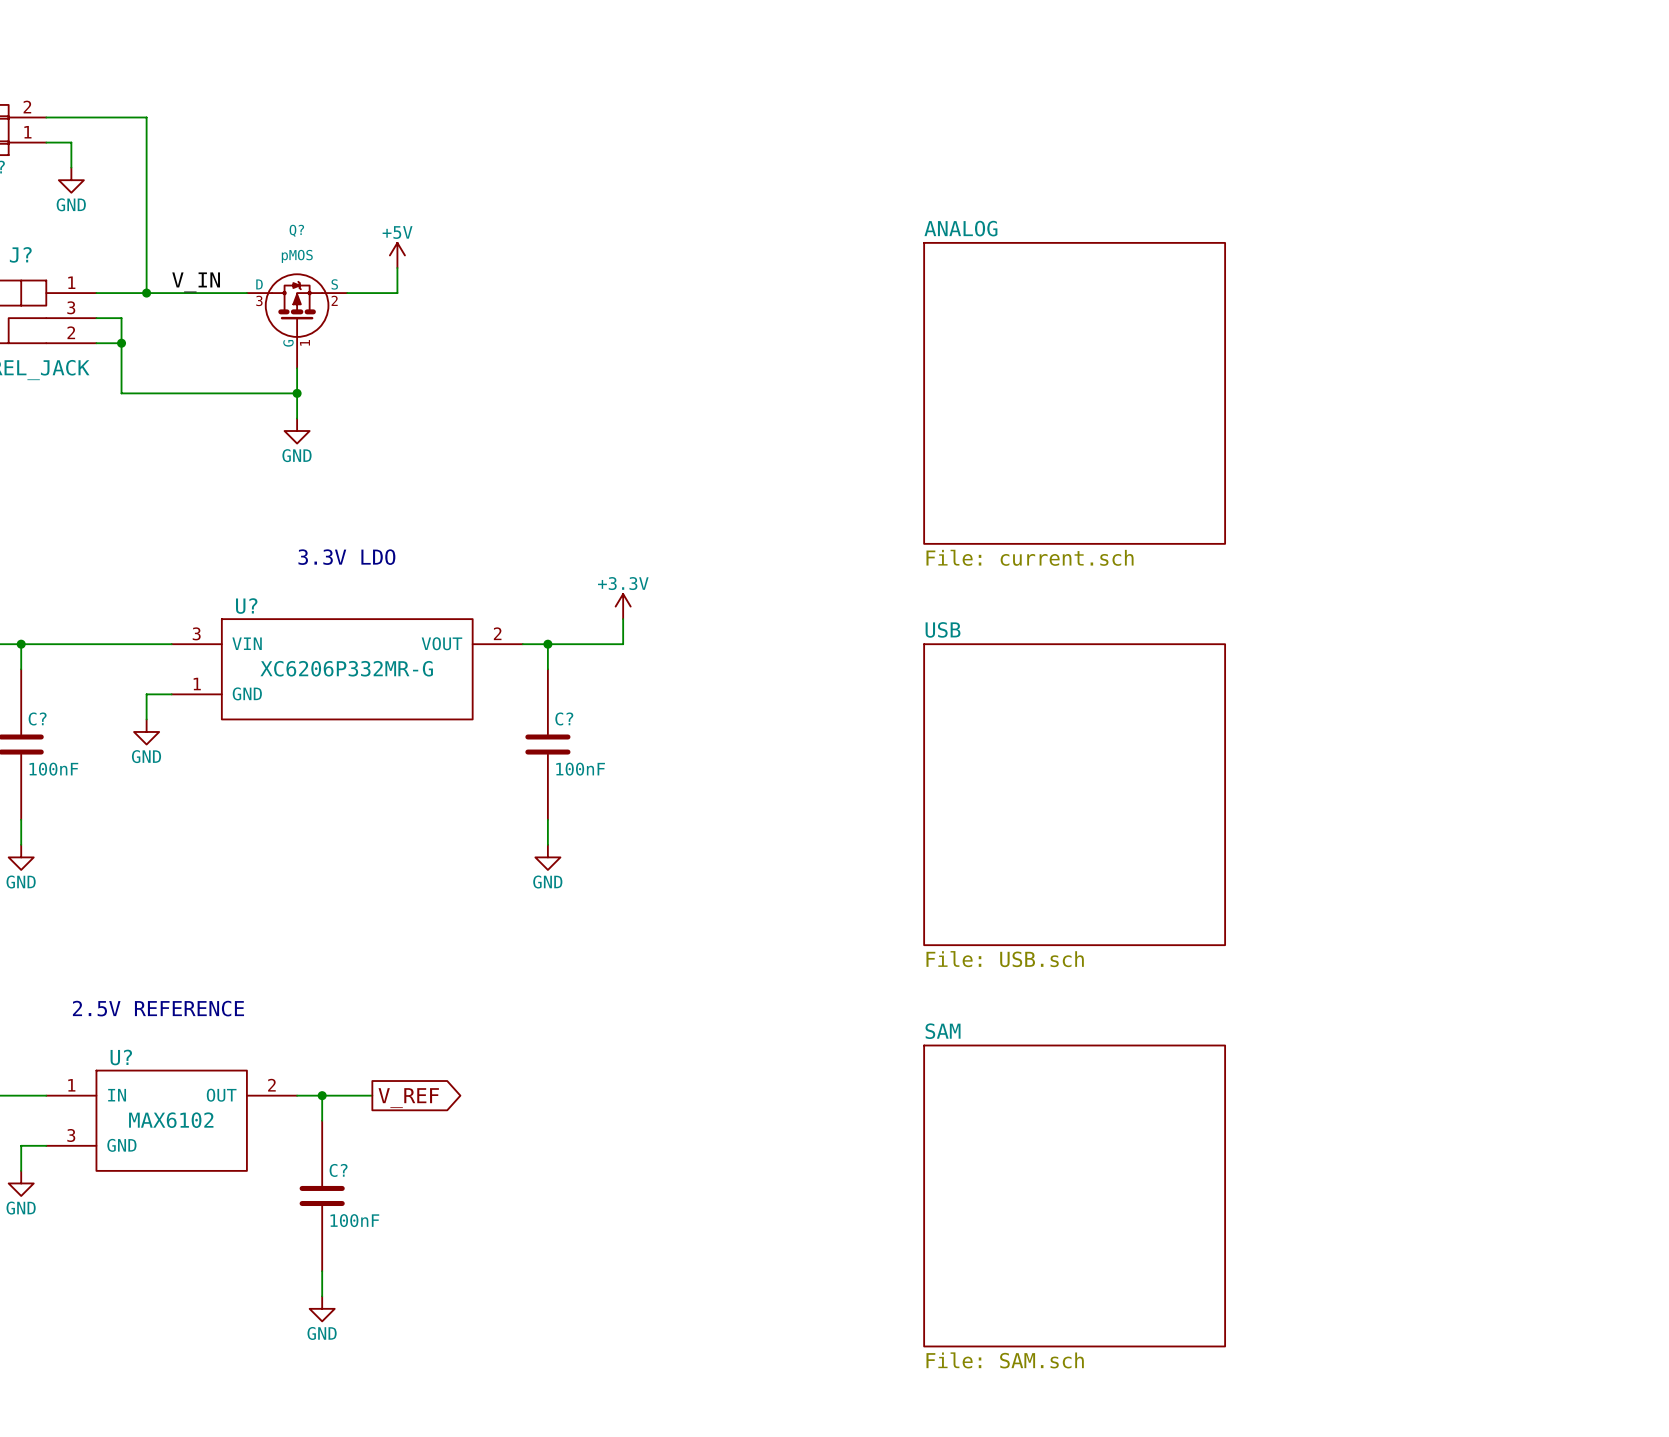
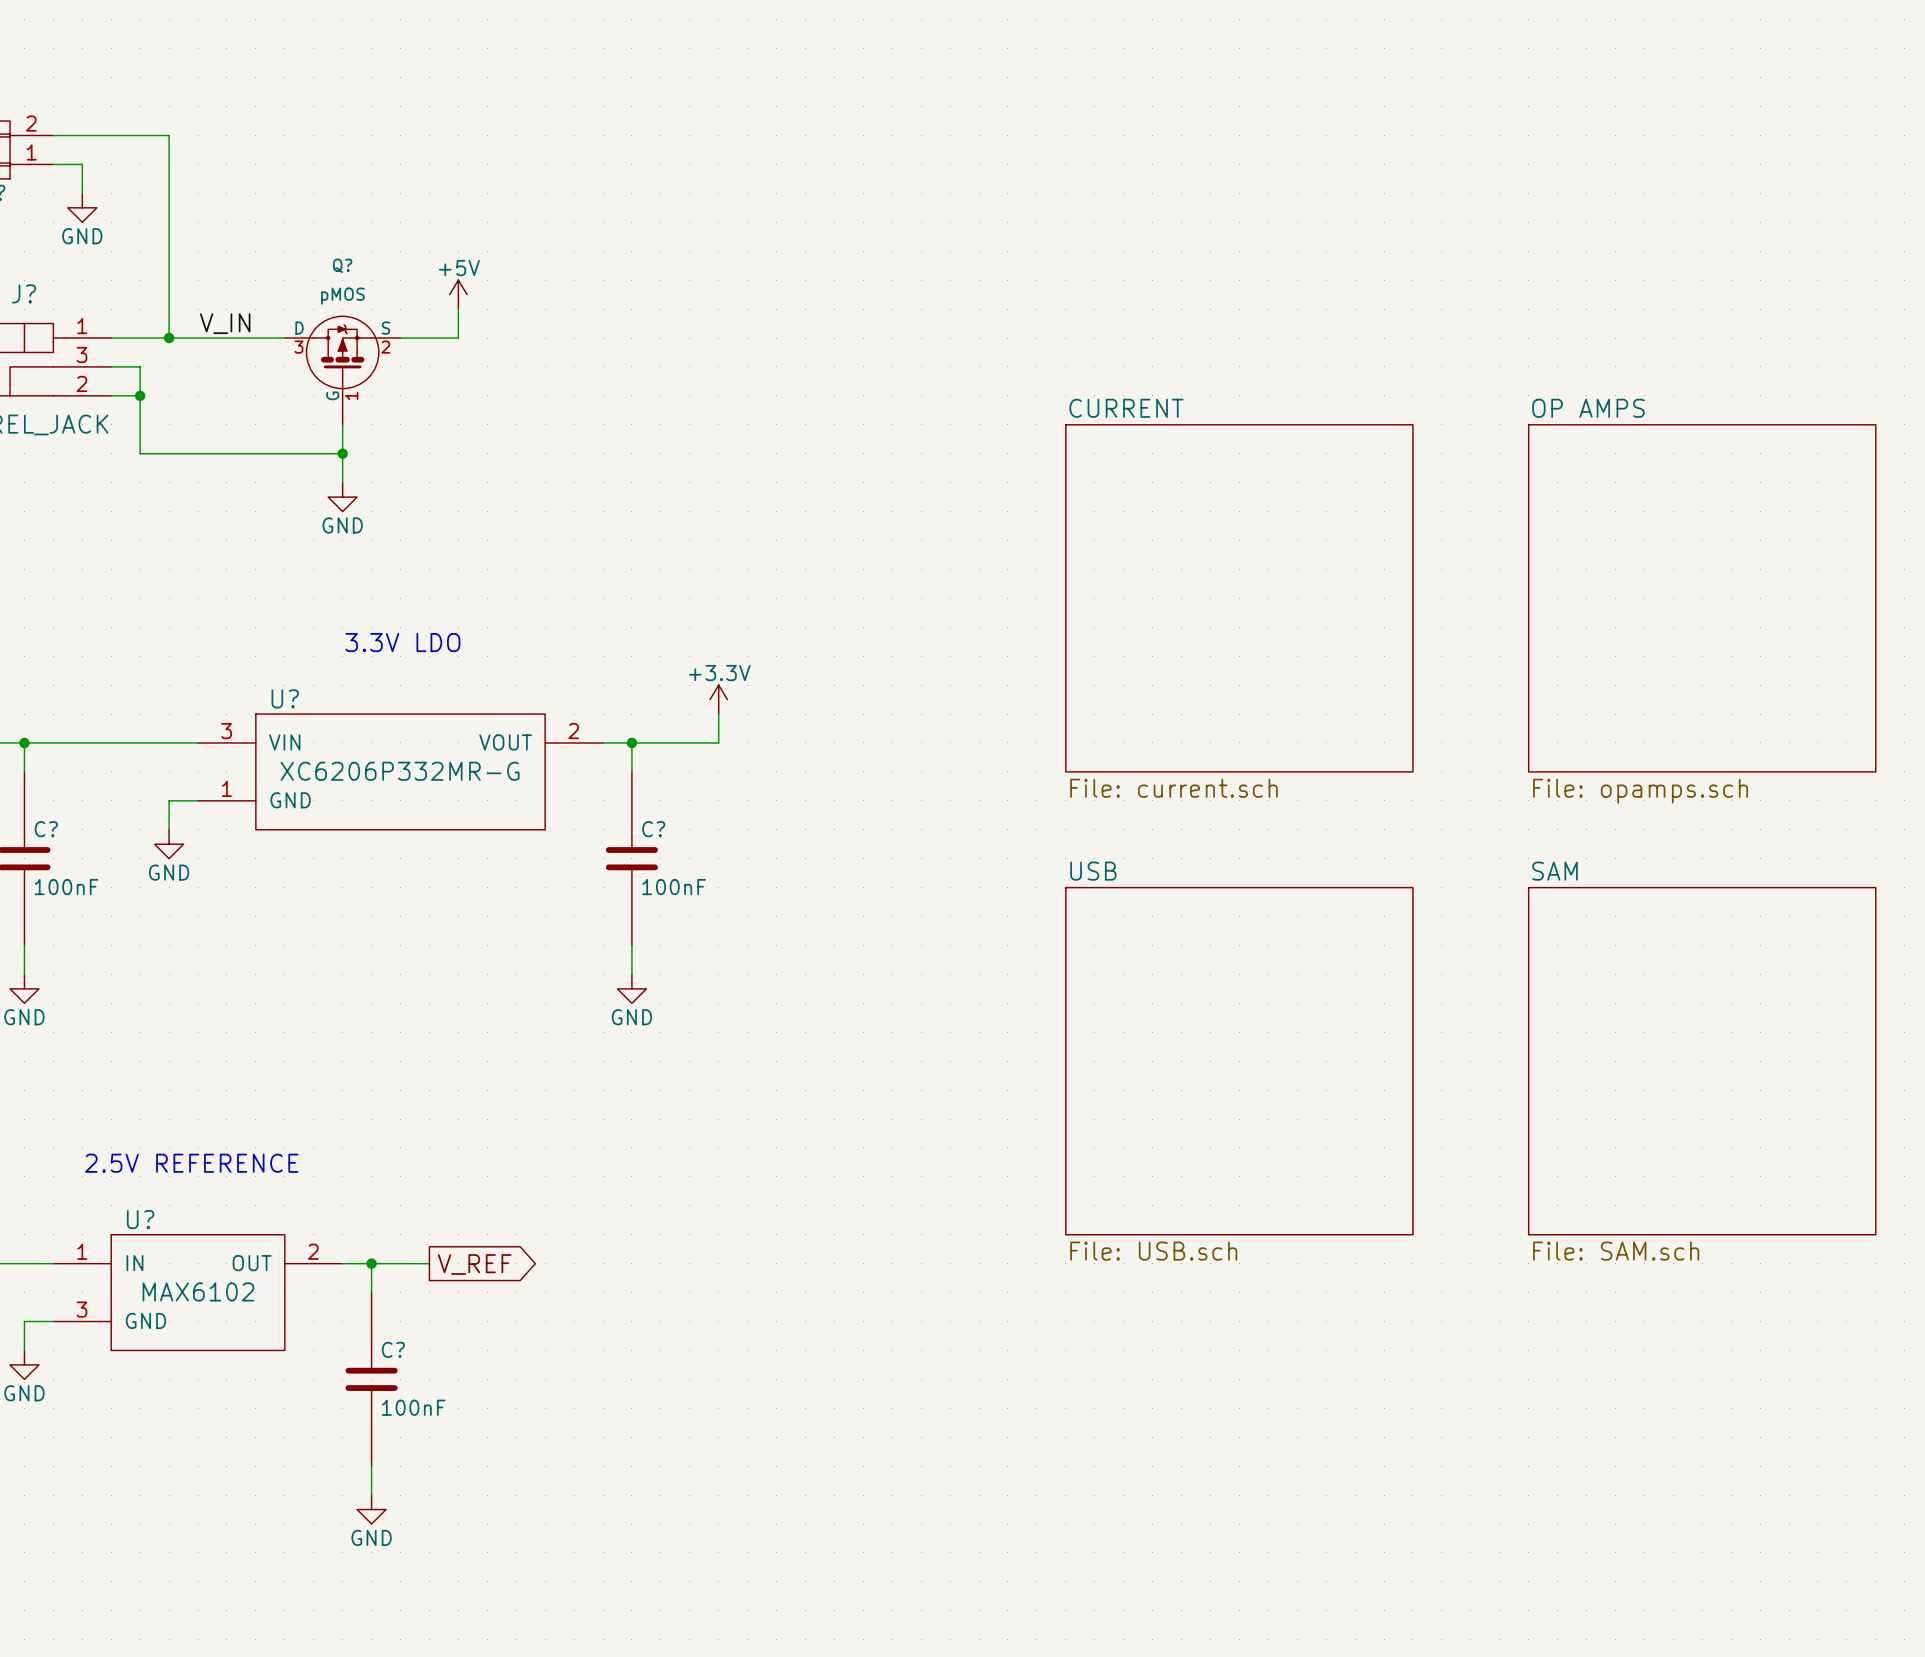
sheet ANALOG: File: current.sch (1074, 393) -> none
sheet CURRENT: none -> File: current.sch (1239, 598)
sheet OP AMPS: none -> File: opamps.sch (1702, 598)
sheet USB position: (1074, 794) -> (1239, 1061)
sheet SAM: none -> File: SAM.sch (1702, 1061)
sheet SAM: File: SAM.sch (1074, 1195) -> none

